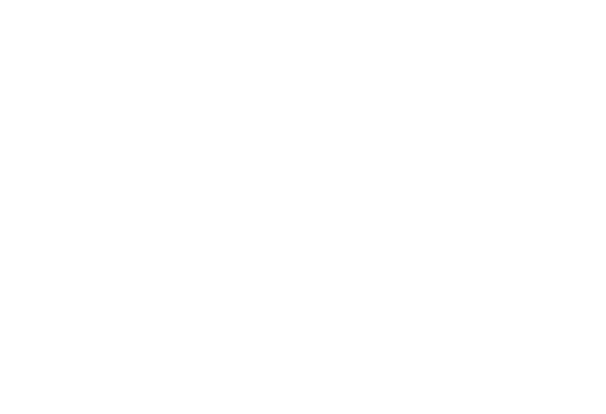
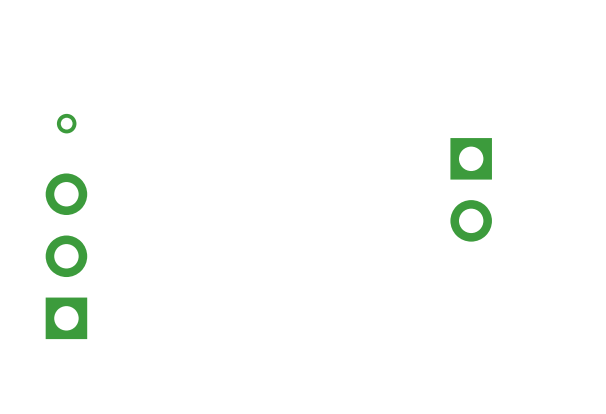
via: none -> (66, 123)
part: none -> (471, 189)
part: none -> (66, 256)

